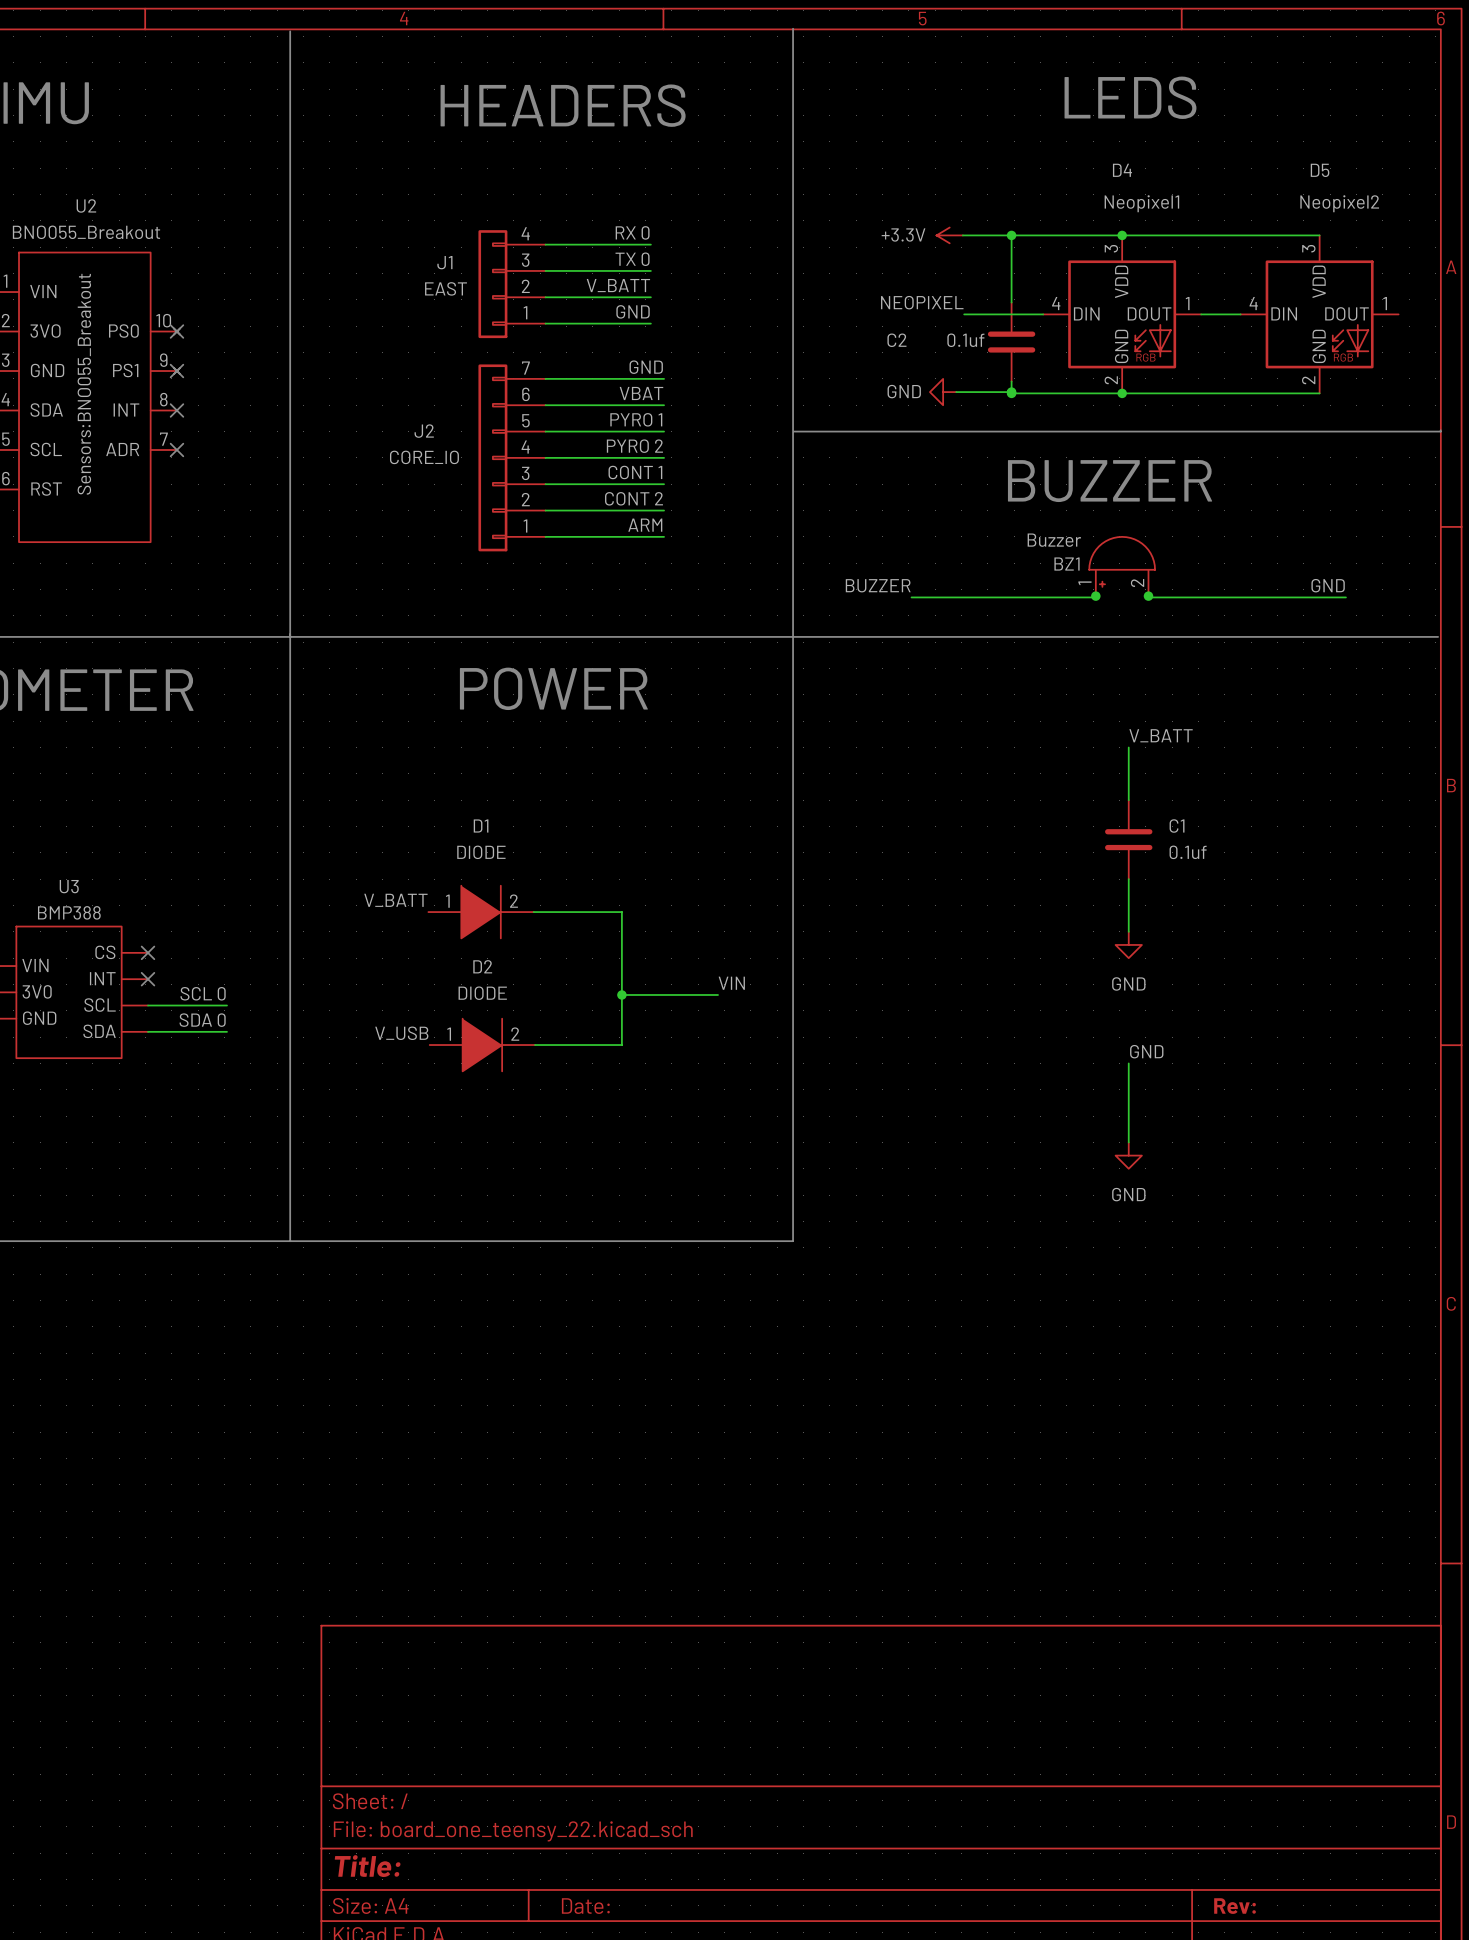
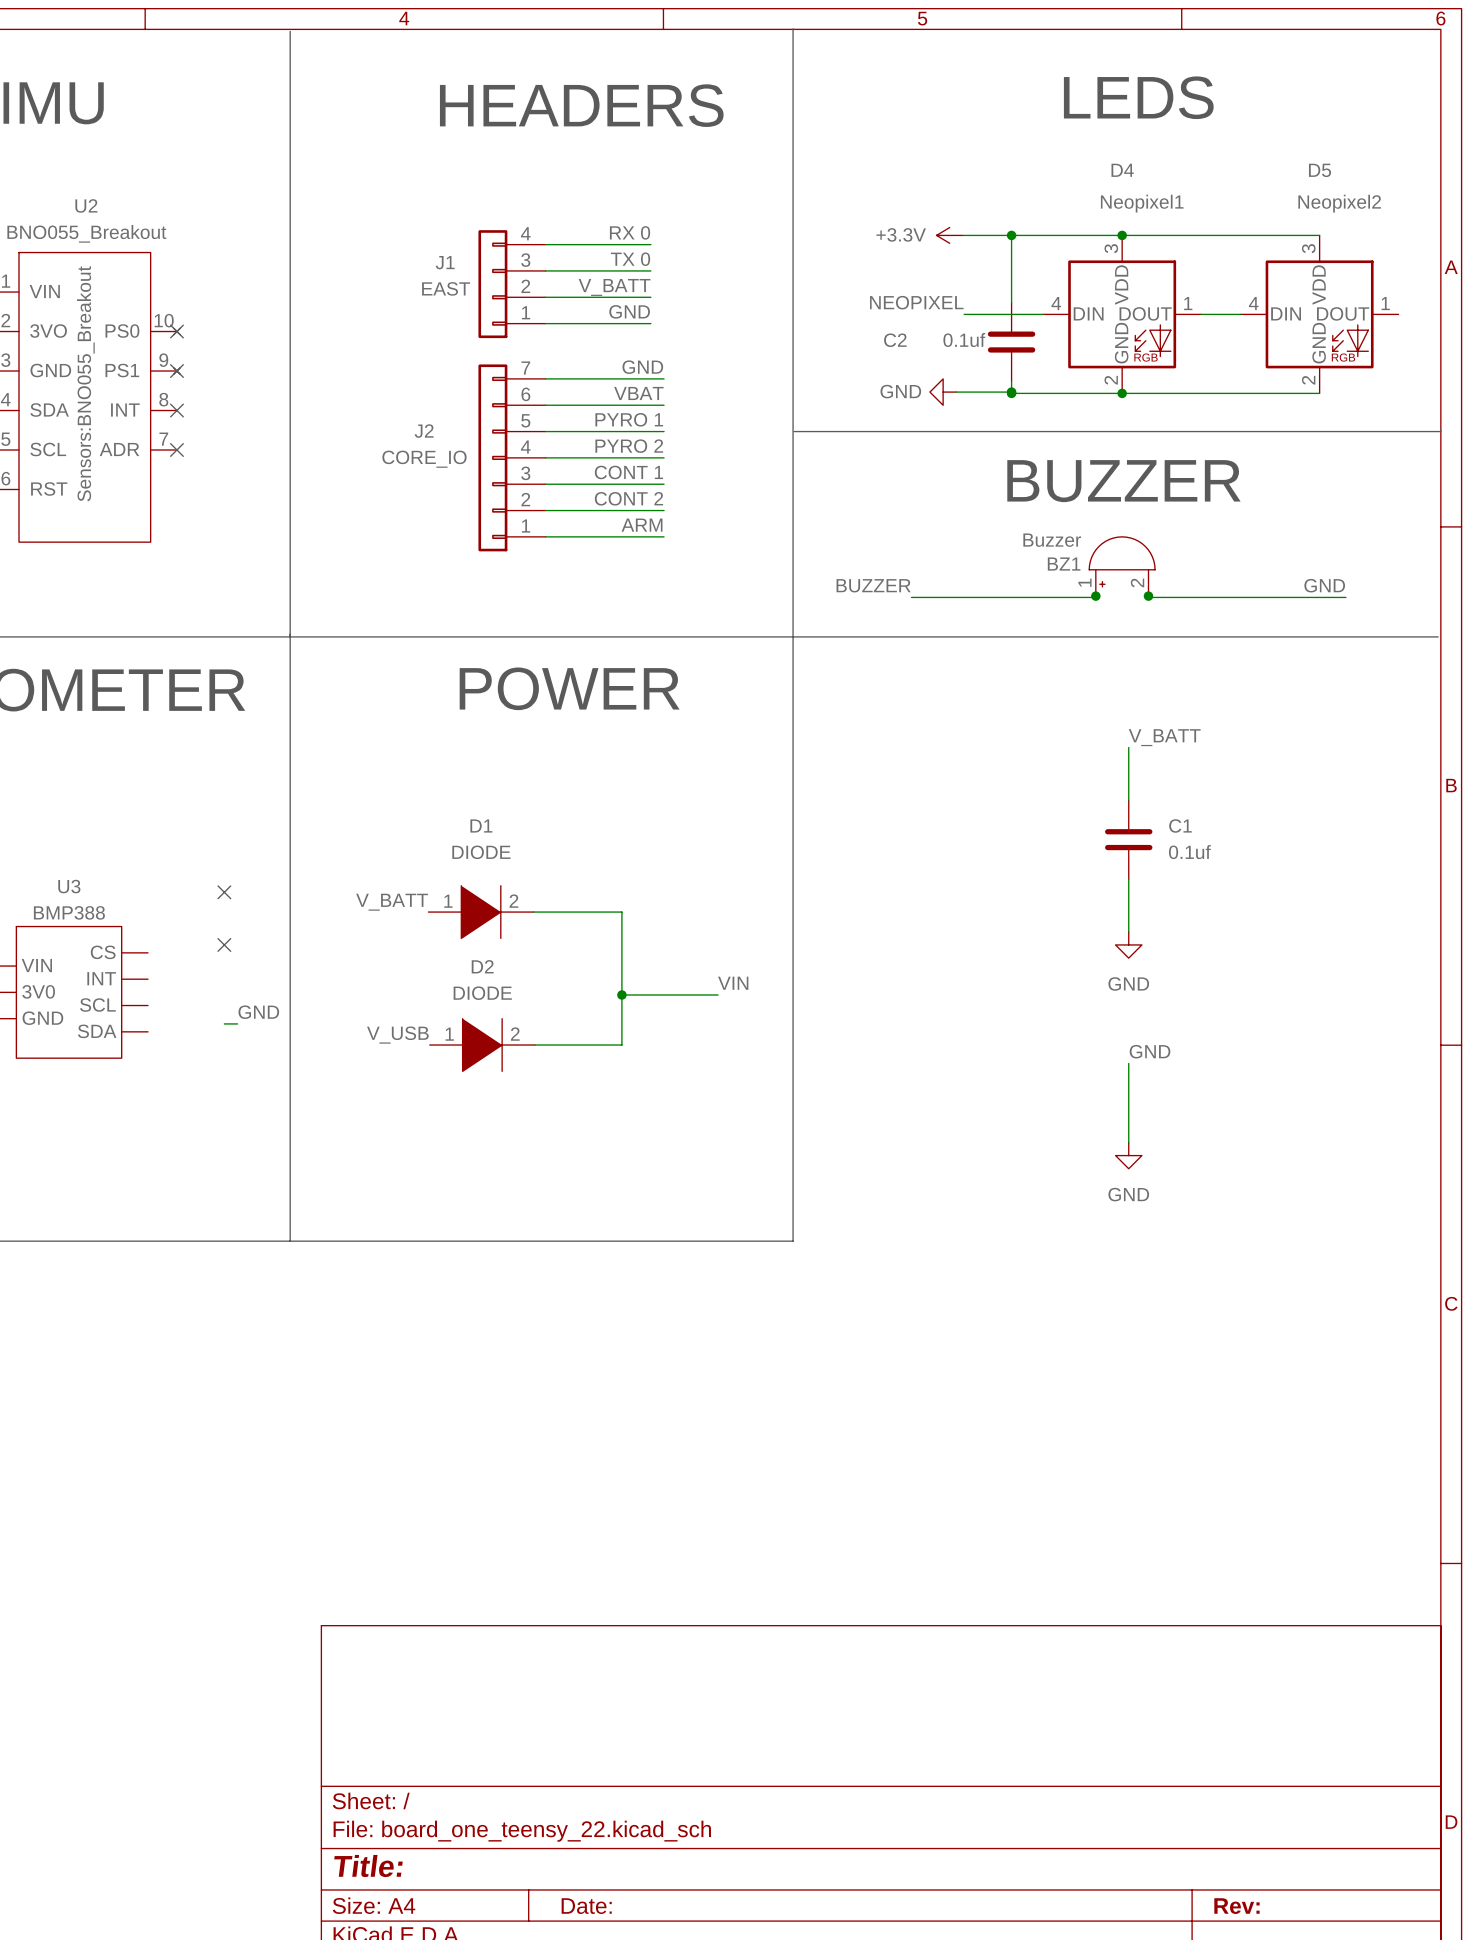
no-connect mark: none -> (224, 892)
no-connect mark: none -> (224, 944)
no-connect mark: (148, 952) -> none
no-connect mark: (148, 979) -> none
label: SCL 0 (203, 993) -> none
wire: (148, 1005) (226, 1005) -> none
label: none -> GND (258, 1012)
label: SDA 0 (202, 1020) -> none
wire: none -> (224, 1023) (237, 1023)
wire: (148, 1031) (226, 1031) -> none

